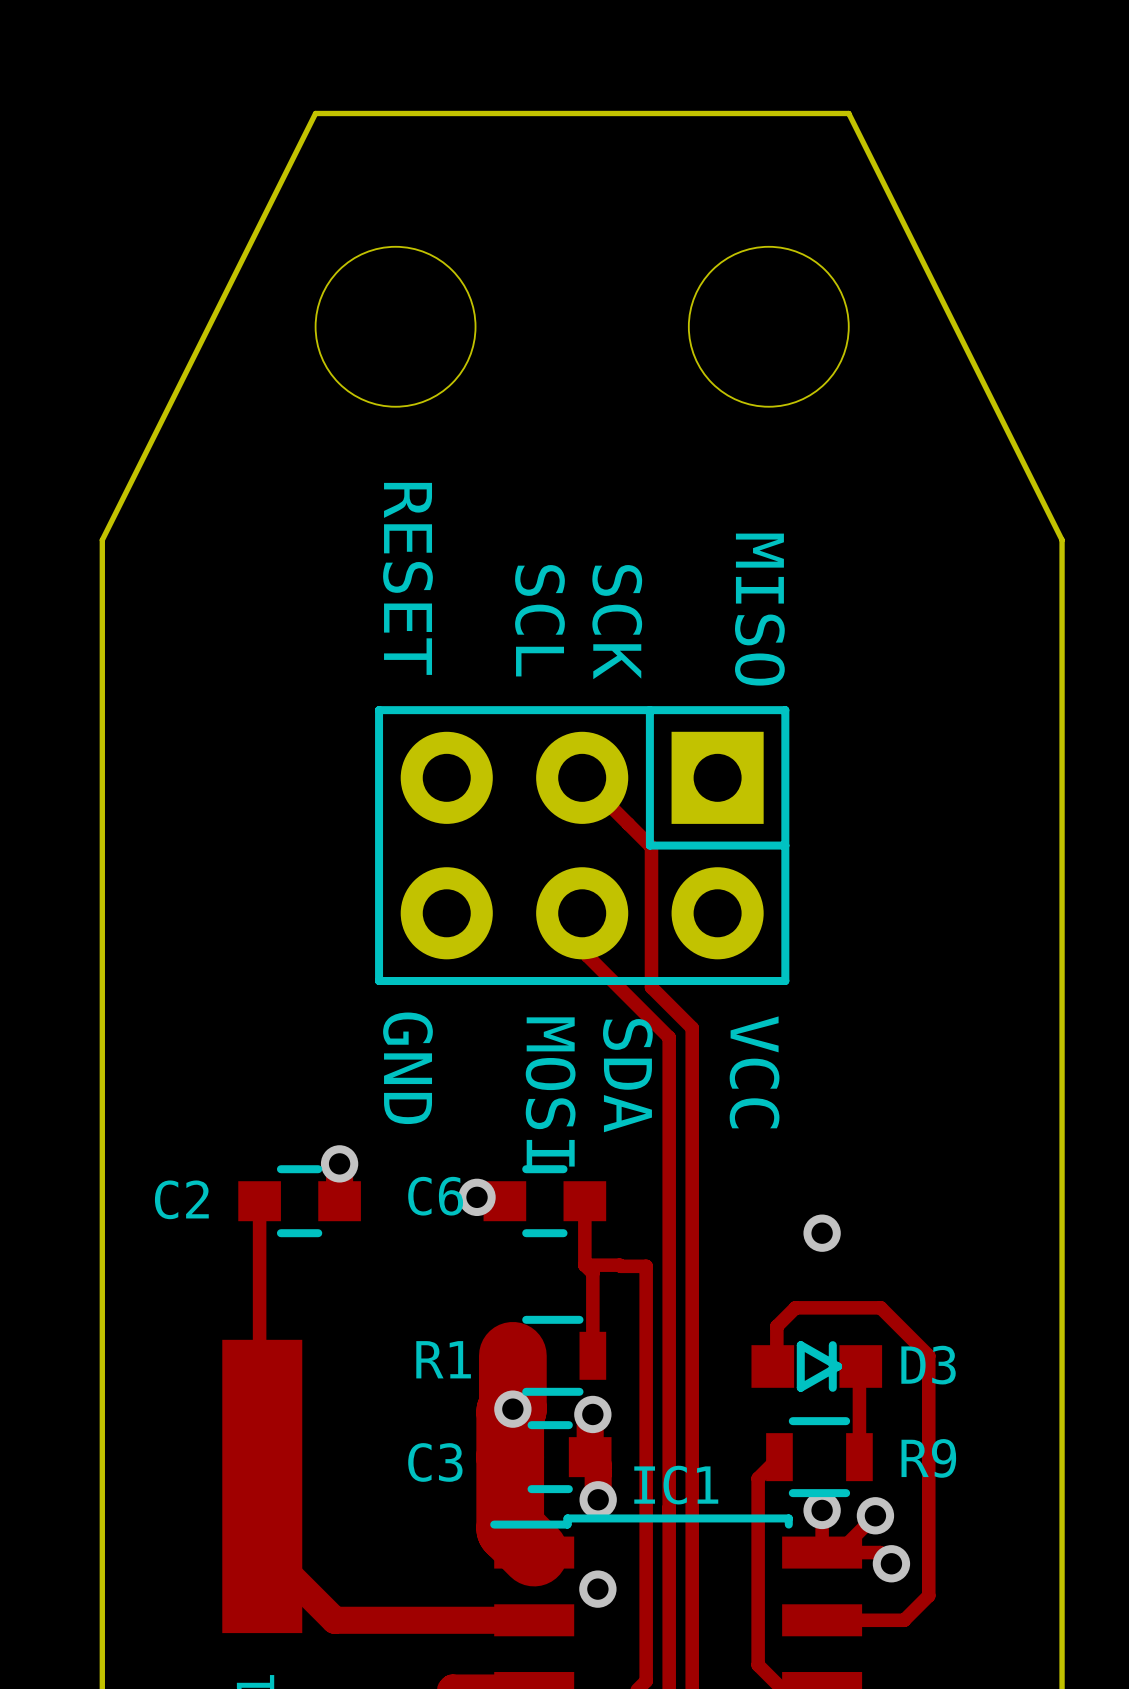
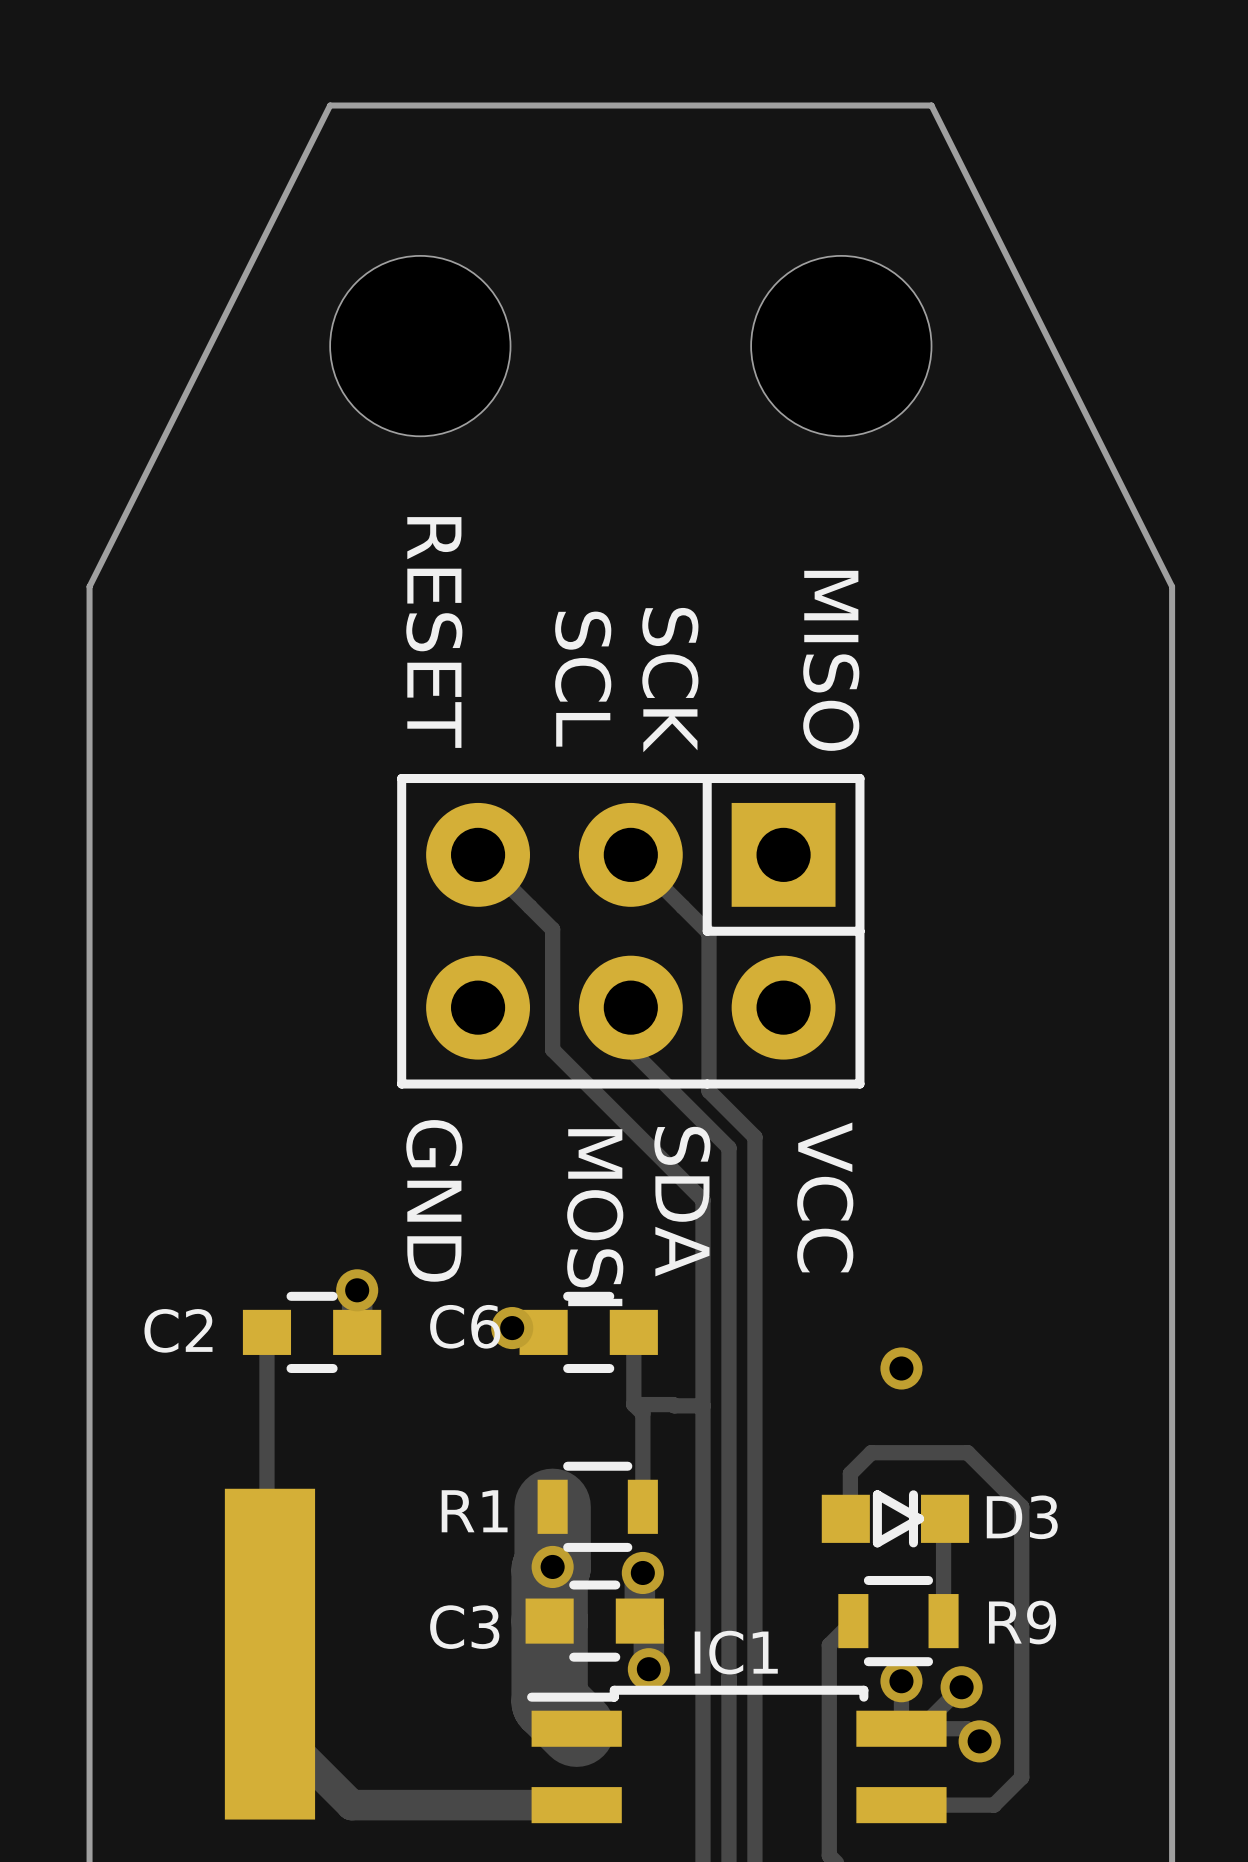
track: none -> (478, 854) (552, 929) (552, 1049) (702, 1200) (702, 1405)
via: (597, 1589) -> none

